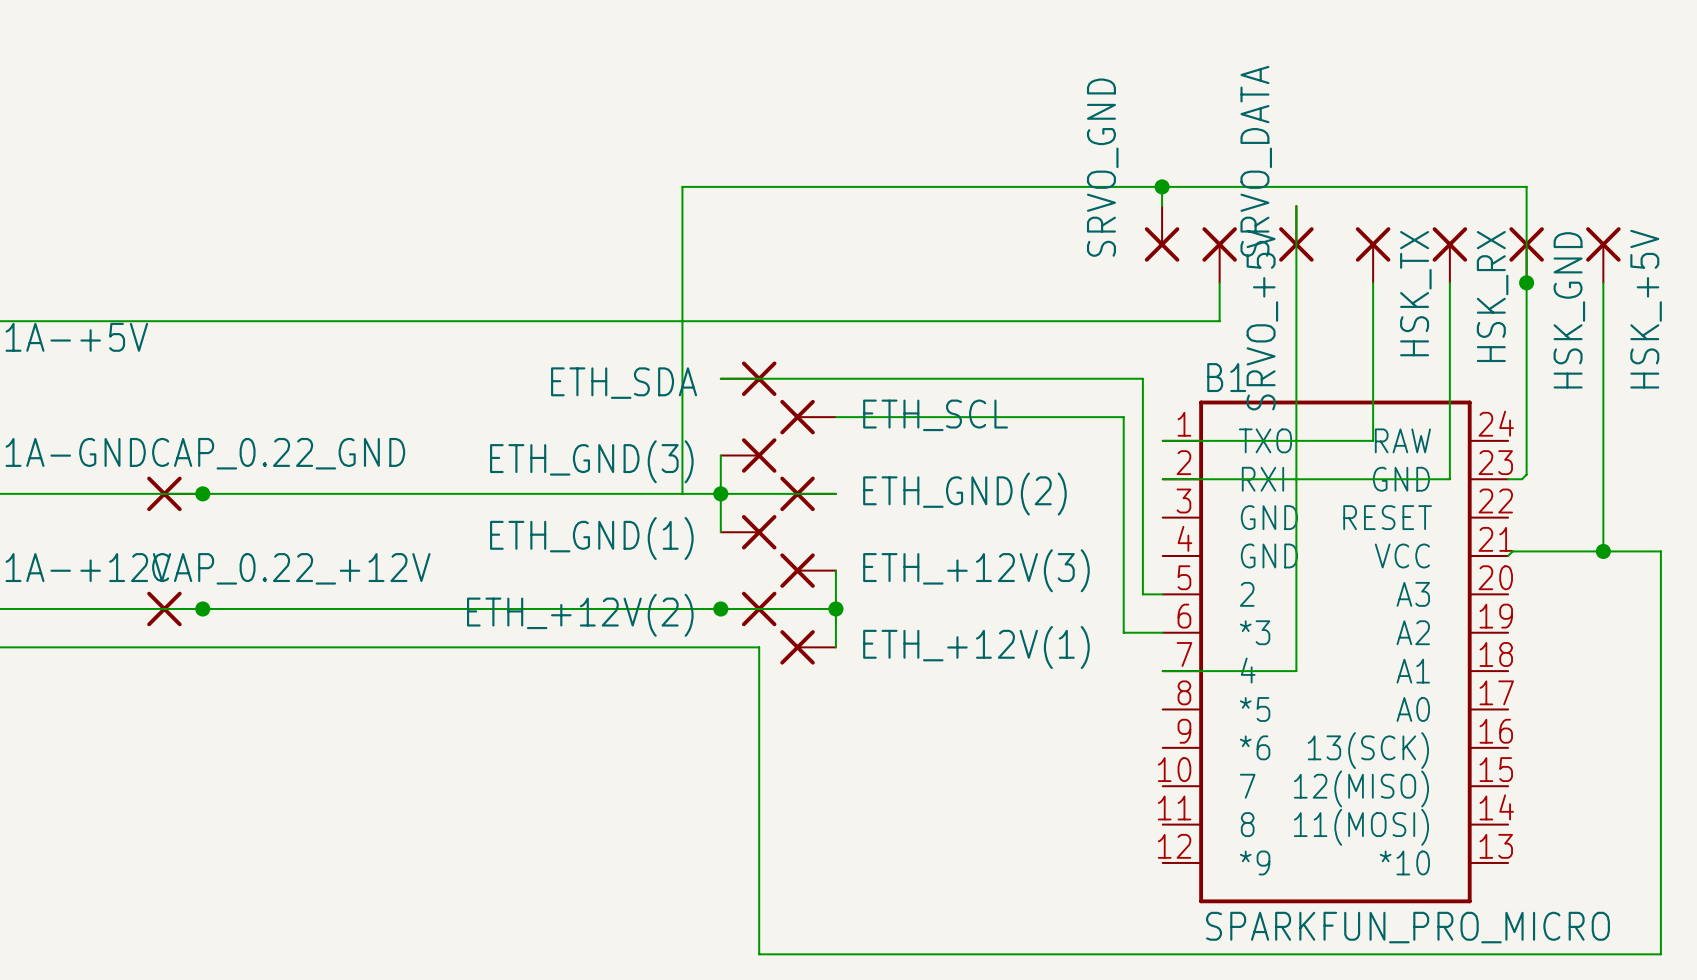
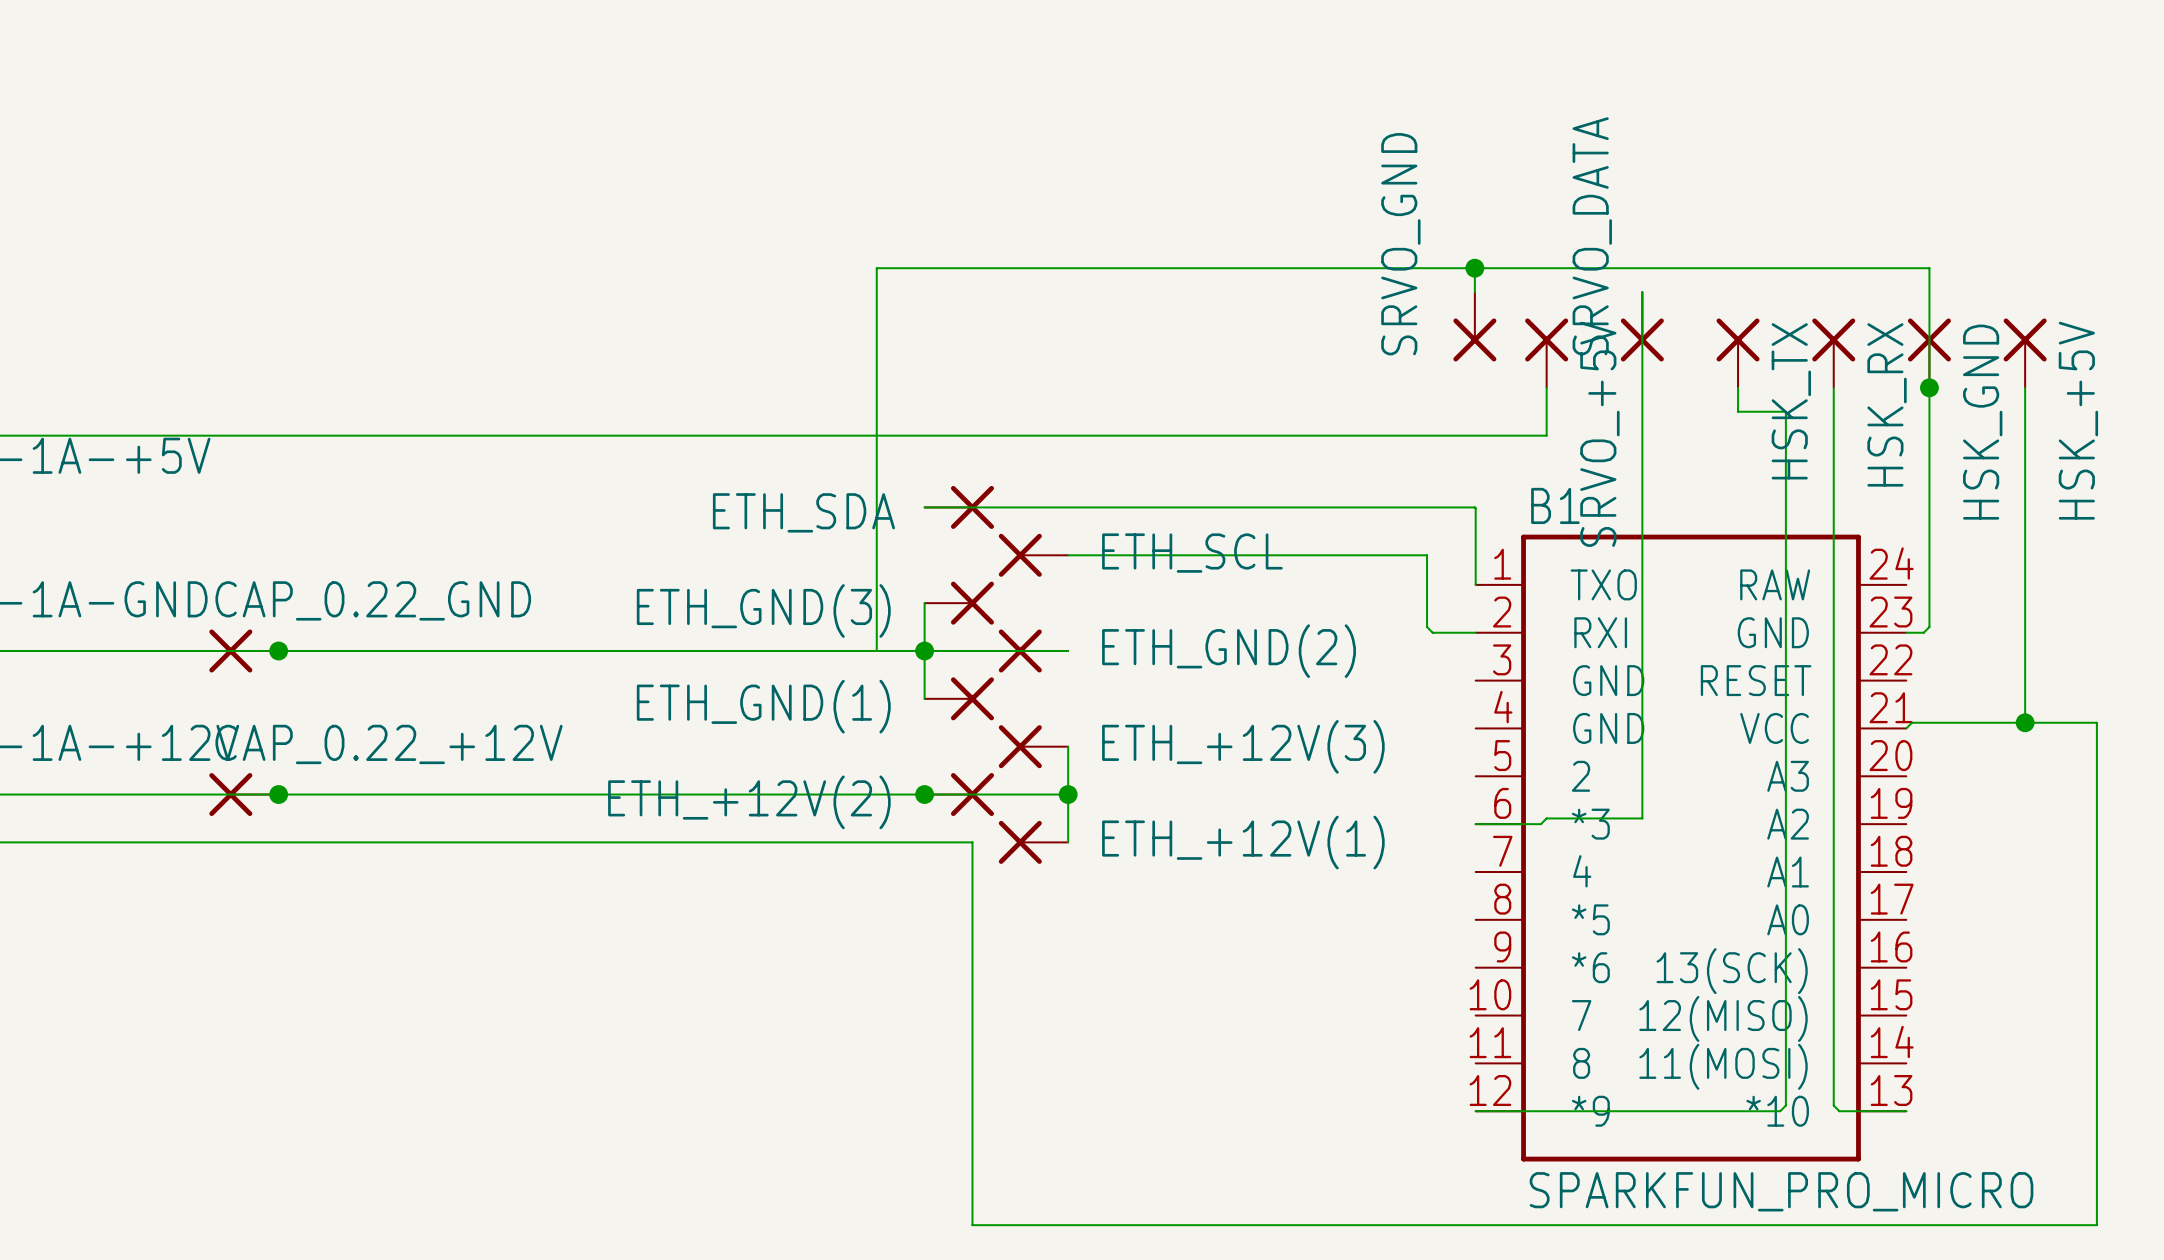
wire: (1373, 302) (1373, 440) (1162, 440) -> (1738, 411) (1785, 411) (1785, 1105) (1780, 1111) (1475, 1111)
wire: (1142, 378) (1142, 594) (1162, 594) -> (1450, 507) (1475, 508) (1475, 584)
wire: (1123, 474) (1123, 632) (1162, 632) -> (1427, 627) (1432, 632) (1475, 632)
wire: (1162, 479) (1449, 479) -> (1906, 1111) (1839, 1111) (1833, 1105) (1833, 632)
wire: (1296, 628) (1296, 671) (1162, 671) -> (1642, 818) (1546, 818) (1540, 824) (1475, 824)

